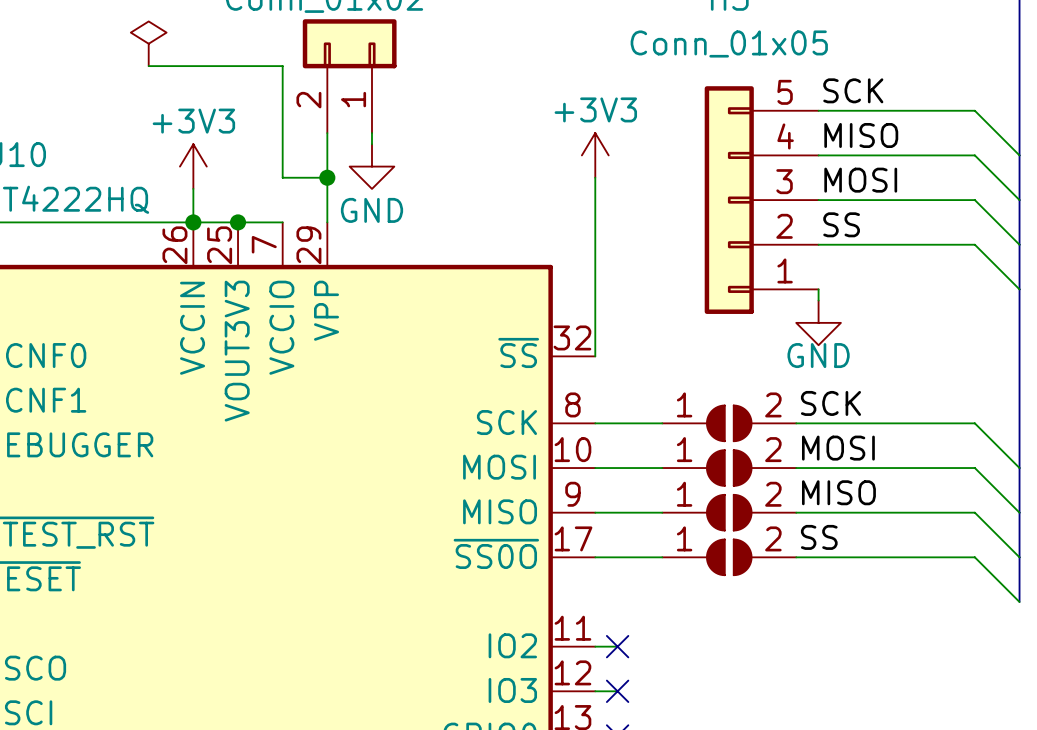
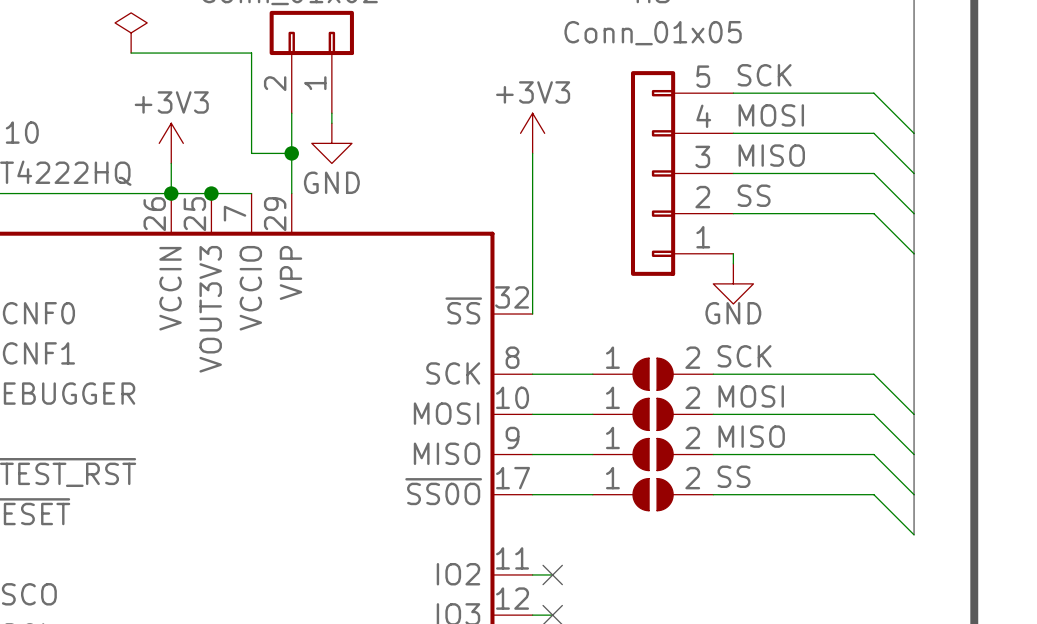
label: MISO (861, 135) -> MOSI (771, 115)
label: MOSI (860, 180) -> MISO (771, 155)

